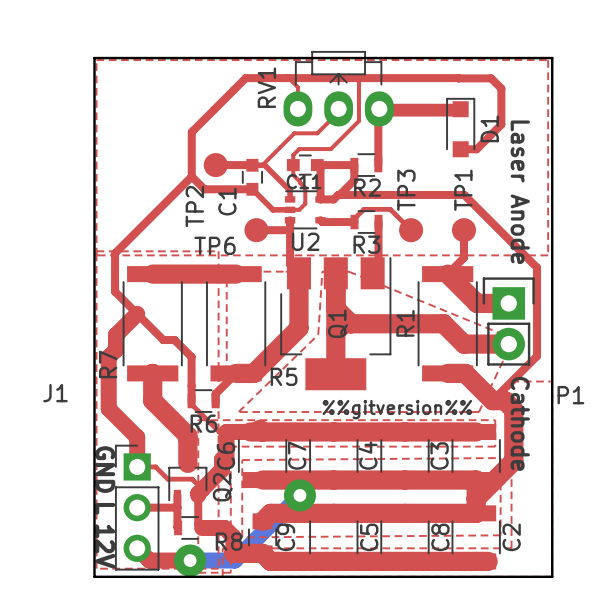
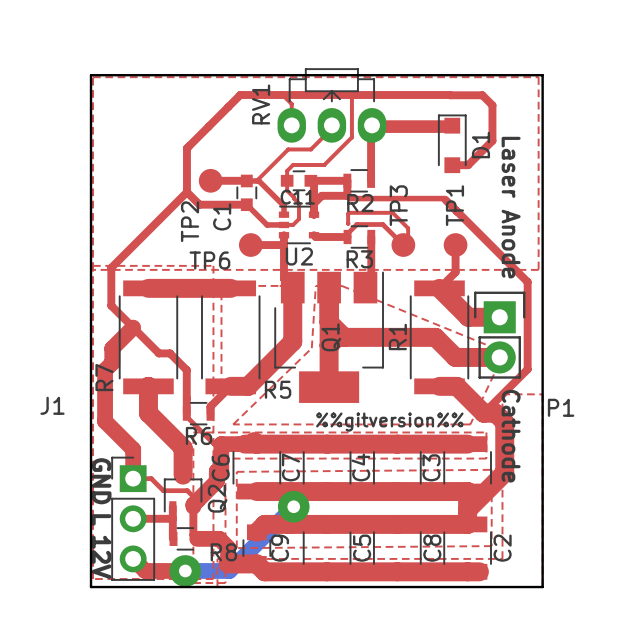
top track: (354, 180) (339, 194) -> none
top track: (464, 194) (338, 194) (333, 199) (320, 199) -> (455, 210) (444, 198) (350, 198) (347, 195) (321, 195) (314, 203)
top track: none -> (348, 223) (349, 212) (392, 212) (408, 228) (408, 245)

